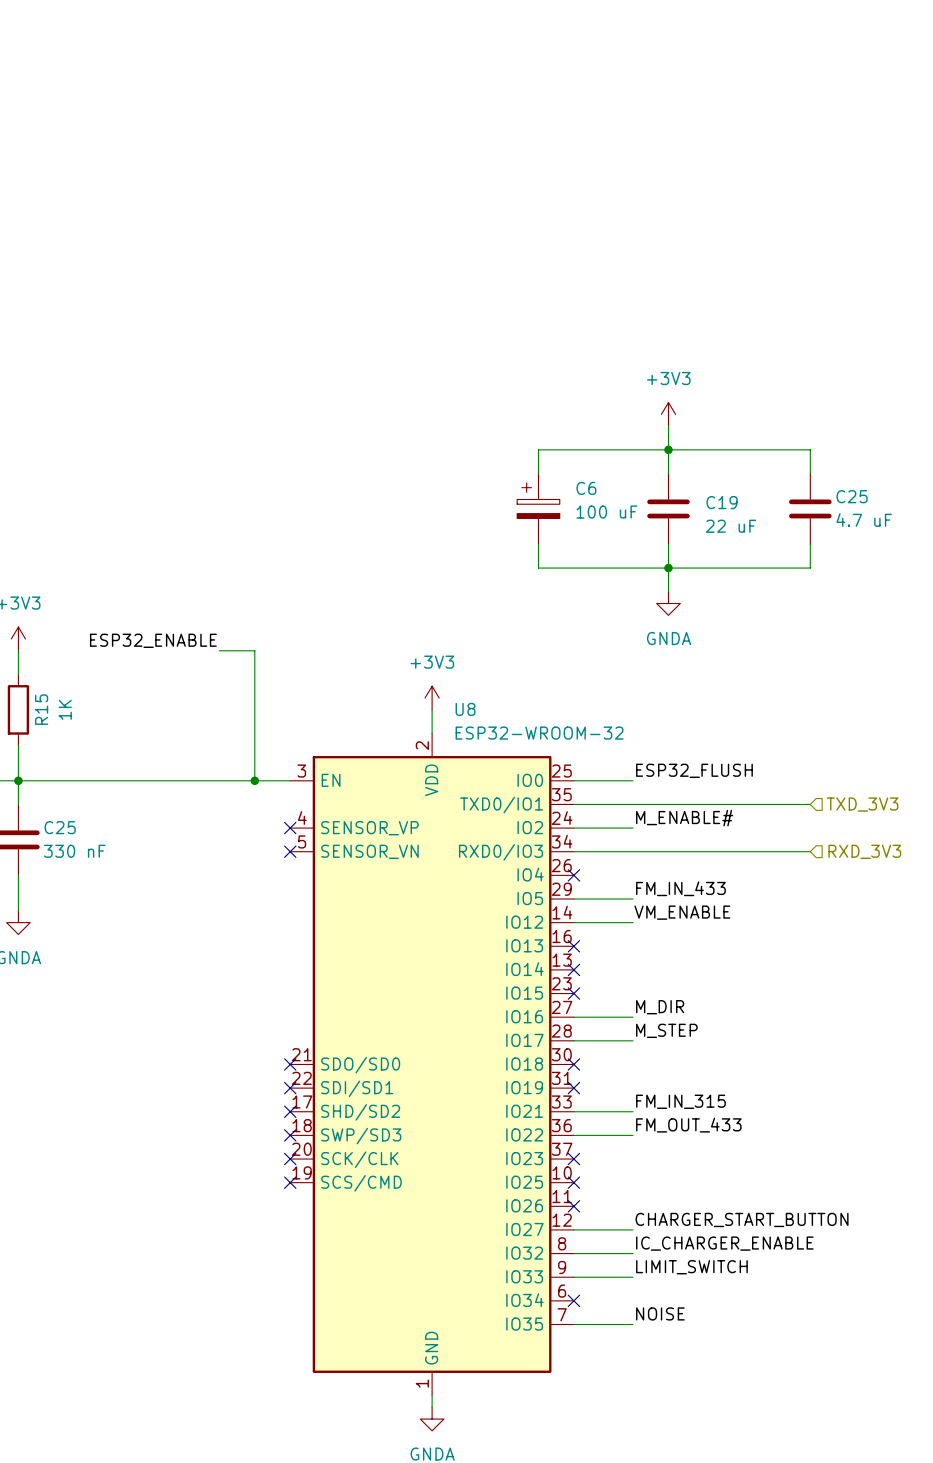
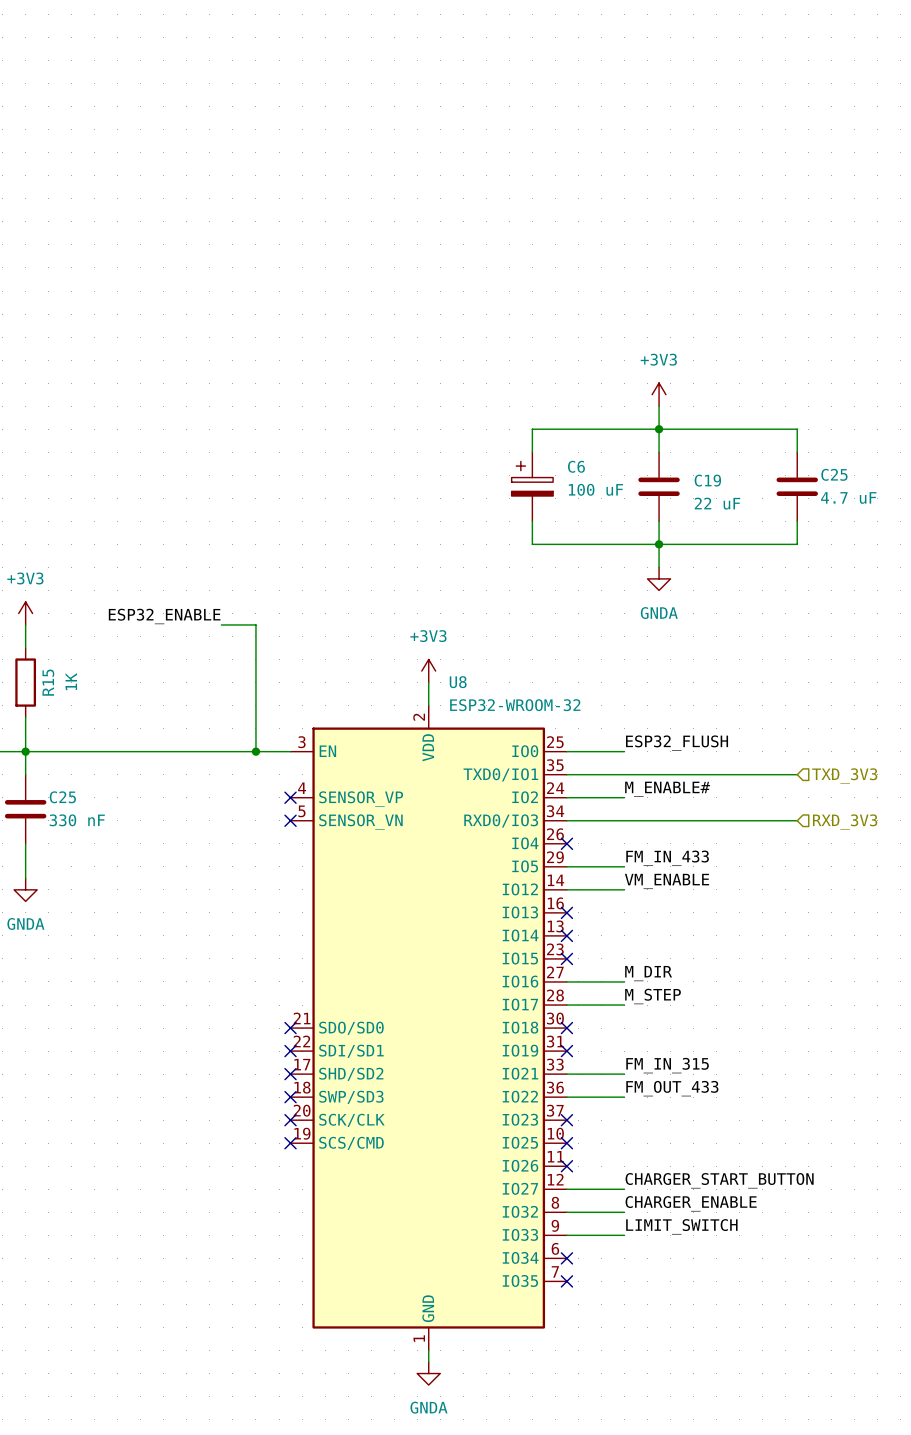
label: IC_CHARGER_ENABLE (724, 1243) -> CHARGER_ENABLE (691, 1203)
label: NOISE (660, 1313) -> none
wire: (573, 1324) (633, 1324) -> none
no-connect mark: none -> (566, 1281)

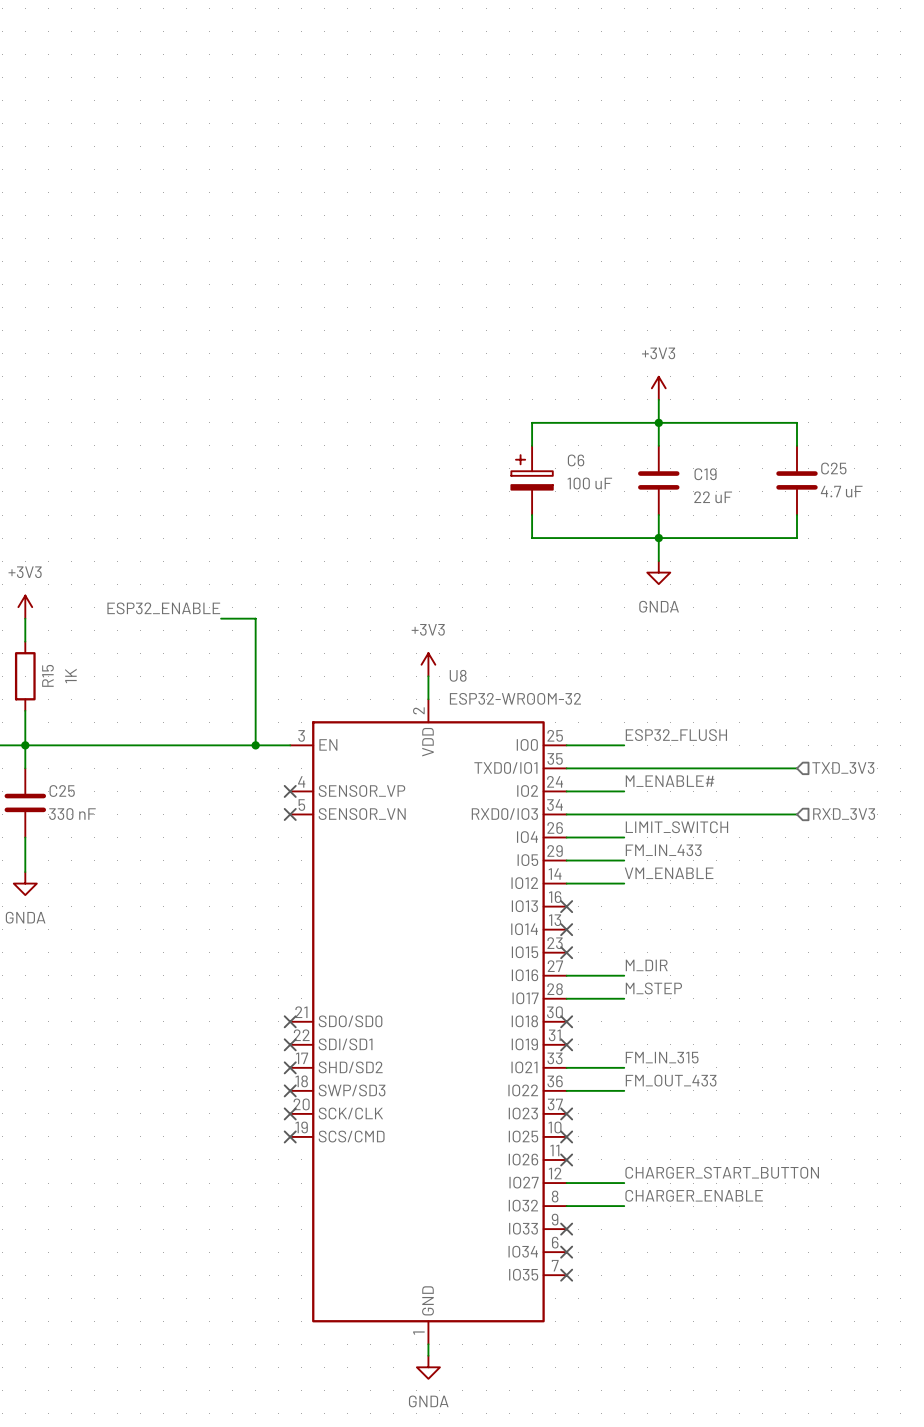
label: none -> LIMIT_SWITCH (676, 827)
wire: none -> (566, 837) (624, 837)
no-connect mark: (566, 843) -> none
label: LIMIT_SWITCH (681, 1226) -> none
wire: (566, 1235) (624, 1235) -> none
no-connect mark: none -> (566, 1229)

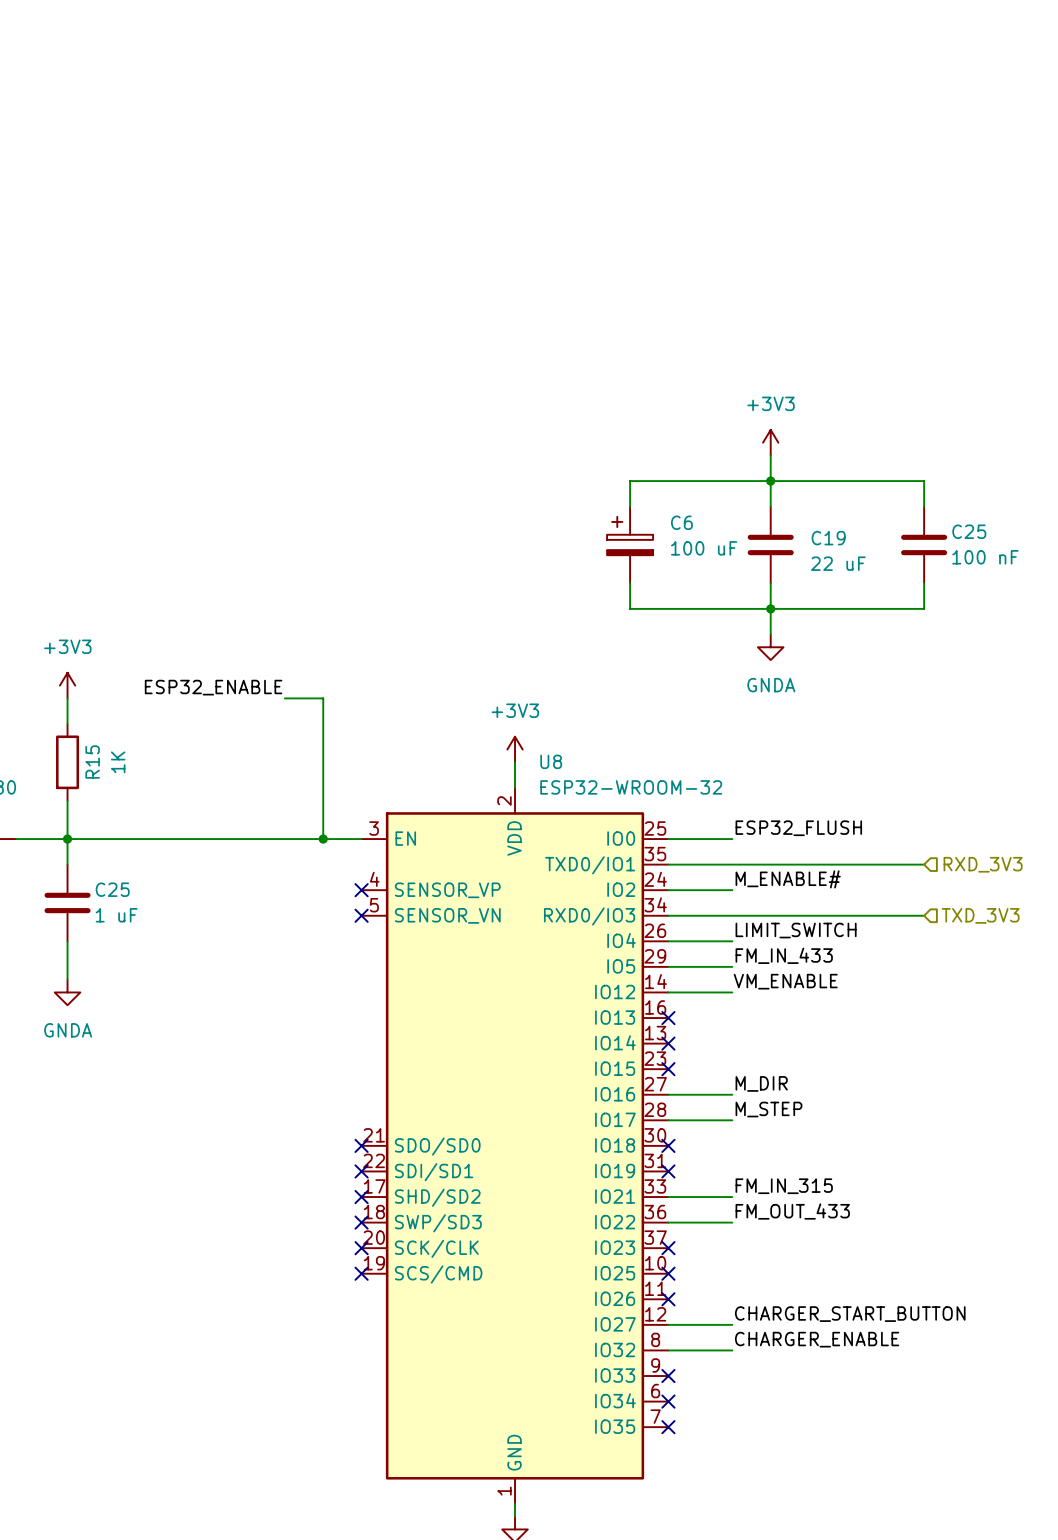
C25 value: 4.7 uF (841, 491) -> 100 nF (985, 557)
hierarchical label: TXD_3V3 (843, 768) -> RXD_3V3 (983, 864)
C25 value: 330 nF (72, 814) -> 1 uF (116, 915)
hierarchical label: RXD_3V3 (844, 814) -> TXD_3V3 (980, 915)

